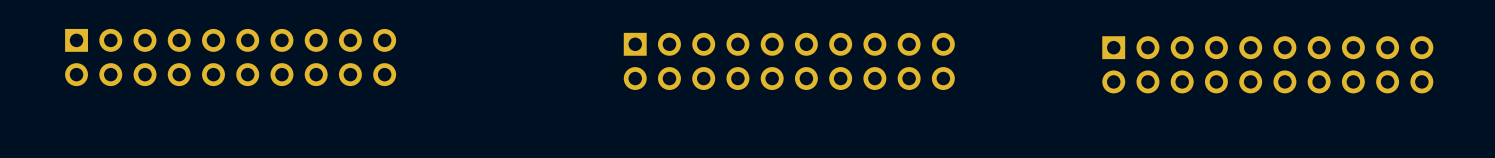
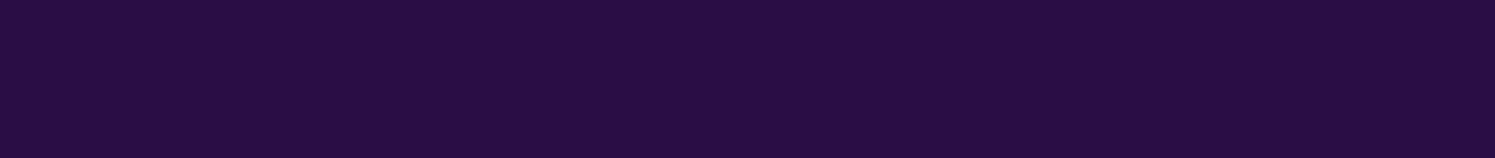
part: (230, 57) -> none
part: (789, 61) -> none
part: (1267, 64) -> none

